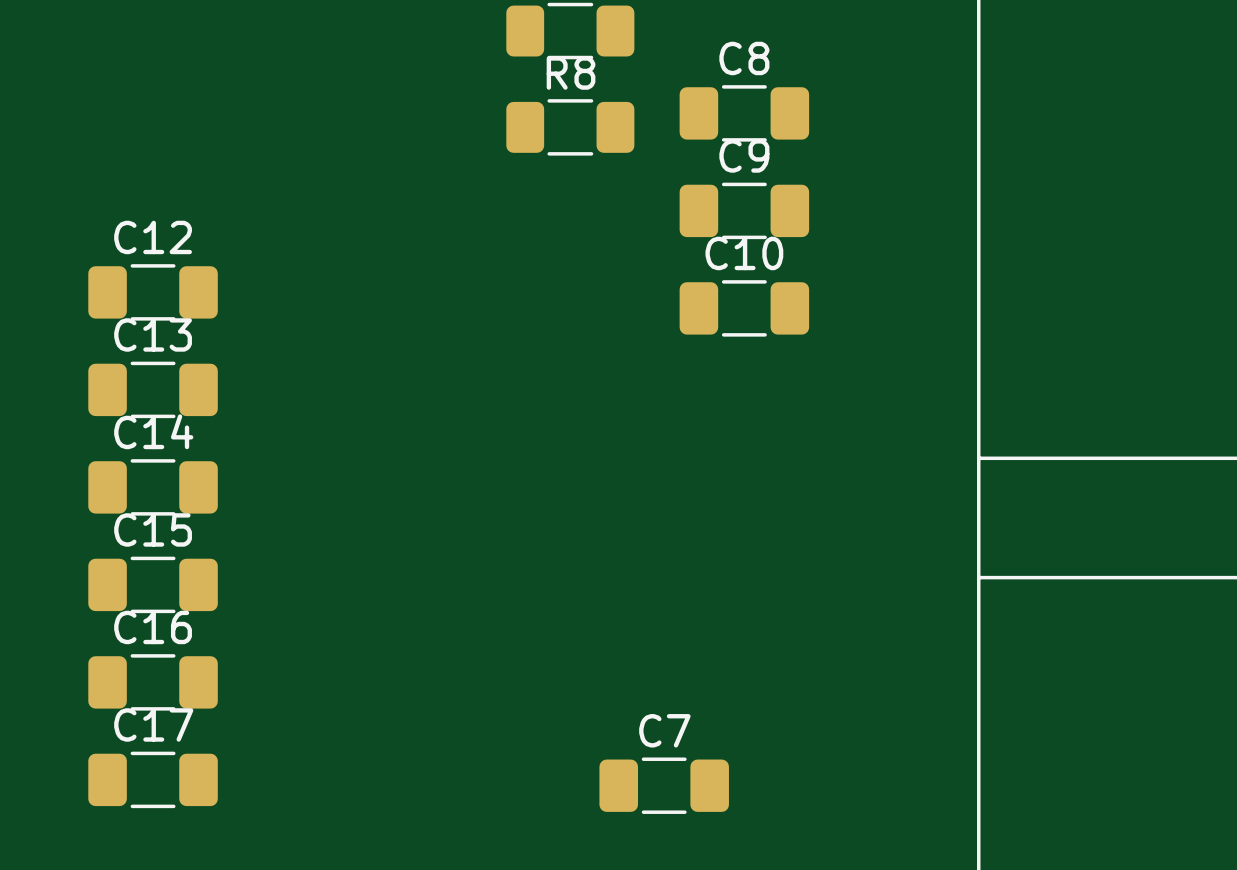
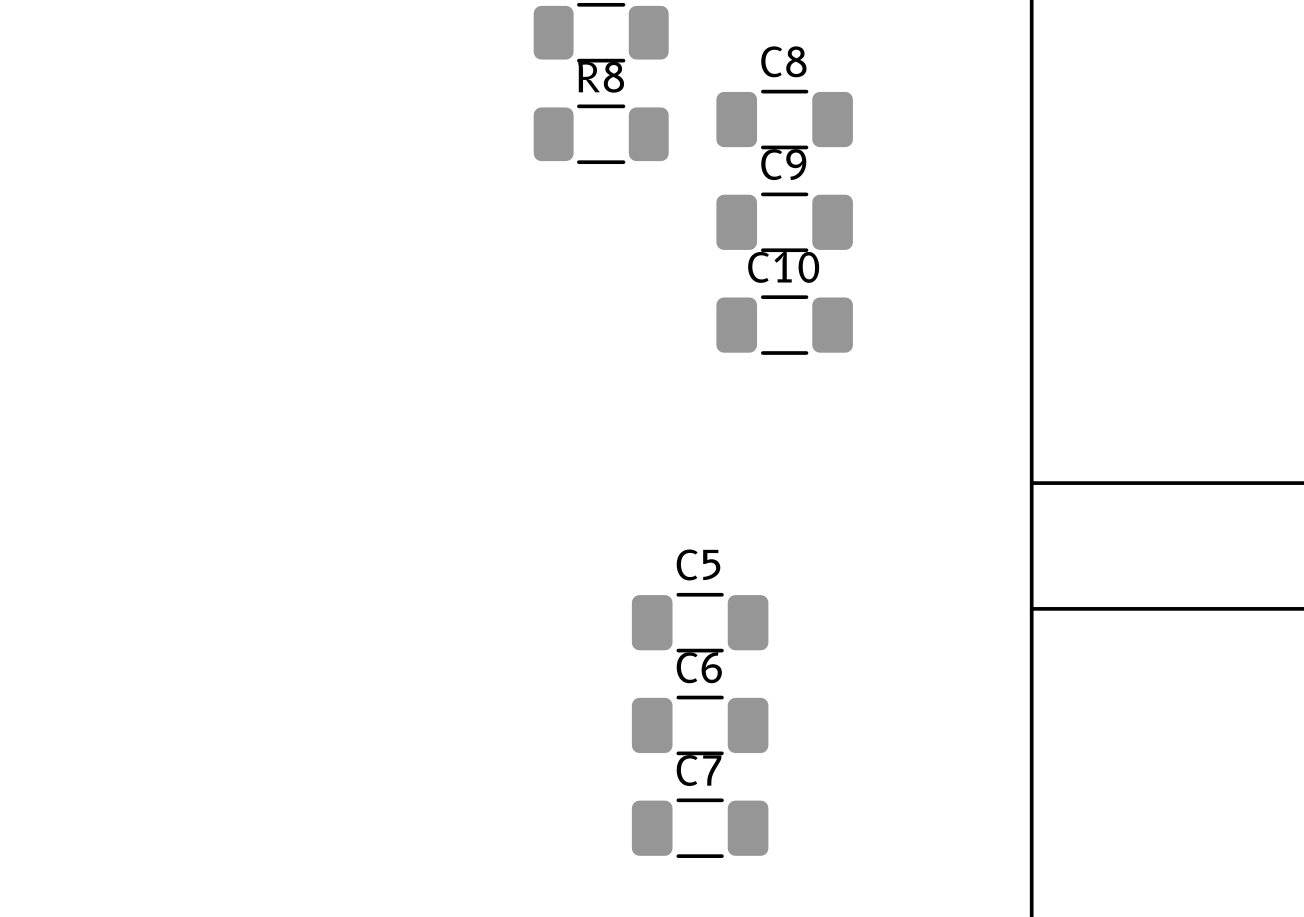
C12: (153, 292) -> none
C13: (153, 389) -> none
C14: (153, 487) -> none
C15: (153, 584) -> none
C5: none -> (700, 622)
C16: (153, 682) -> none
C6: none -> (700, 725)
C17: (153, 779) -> none

